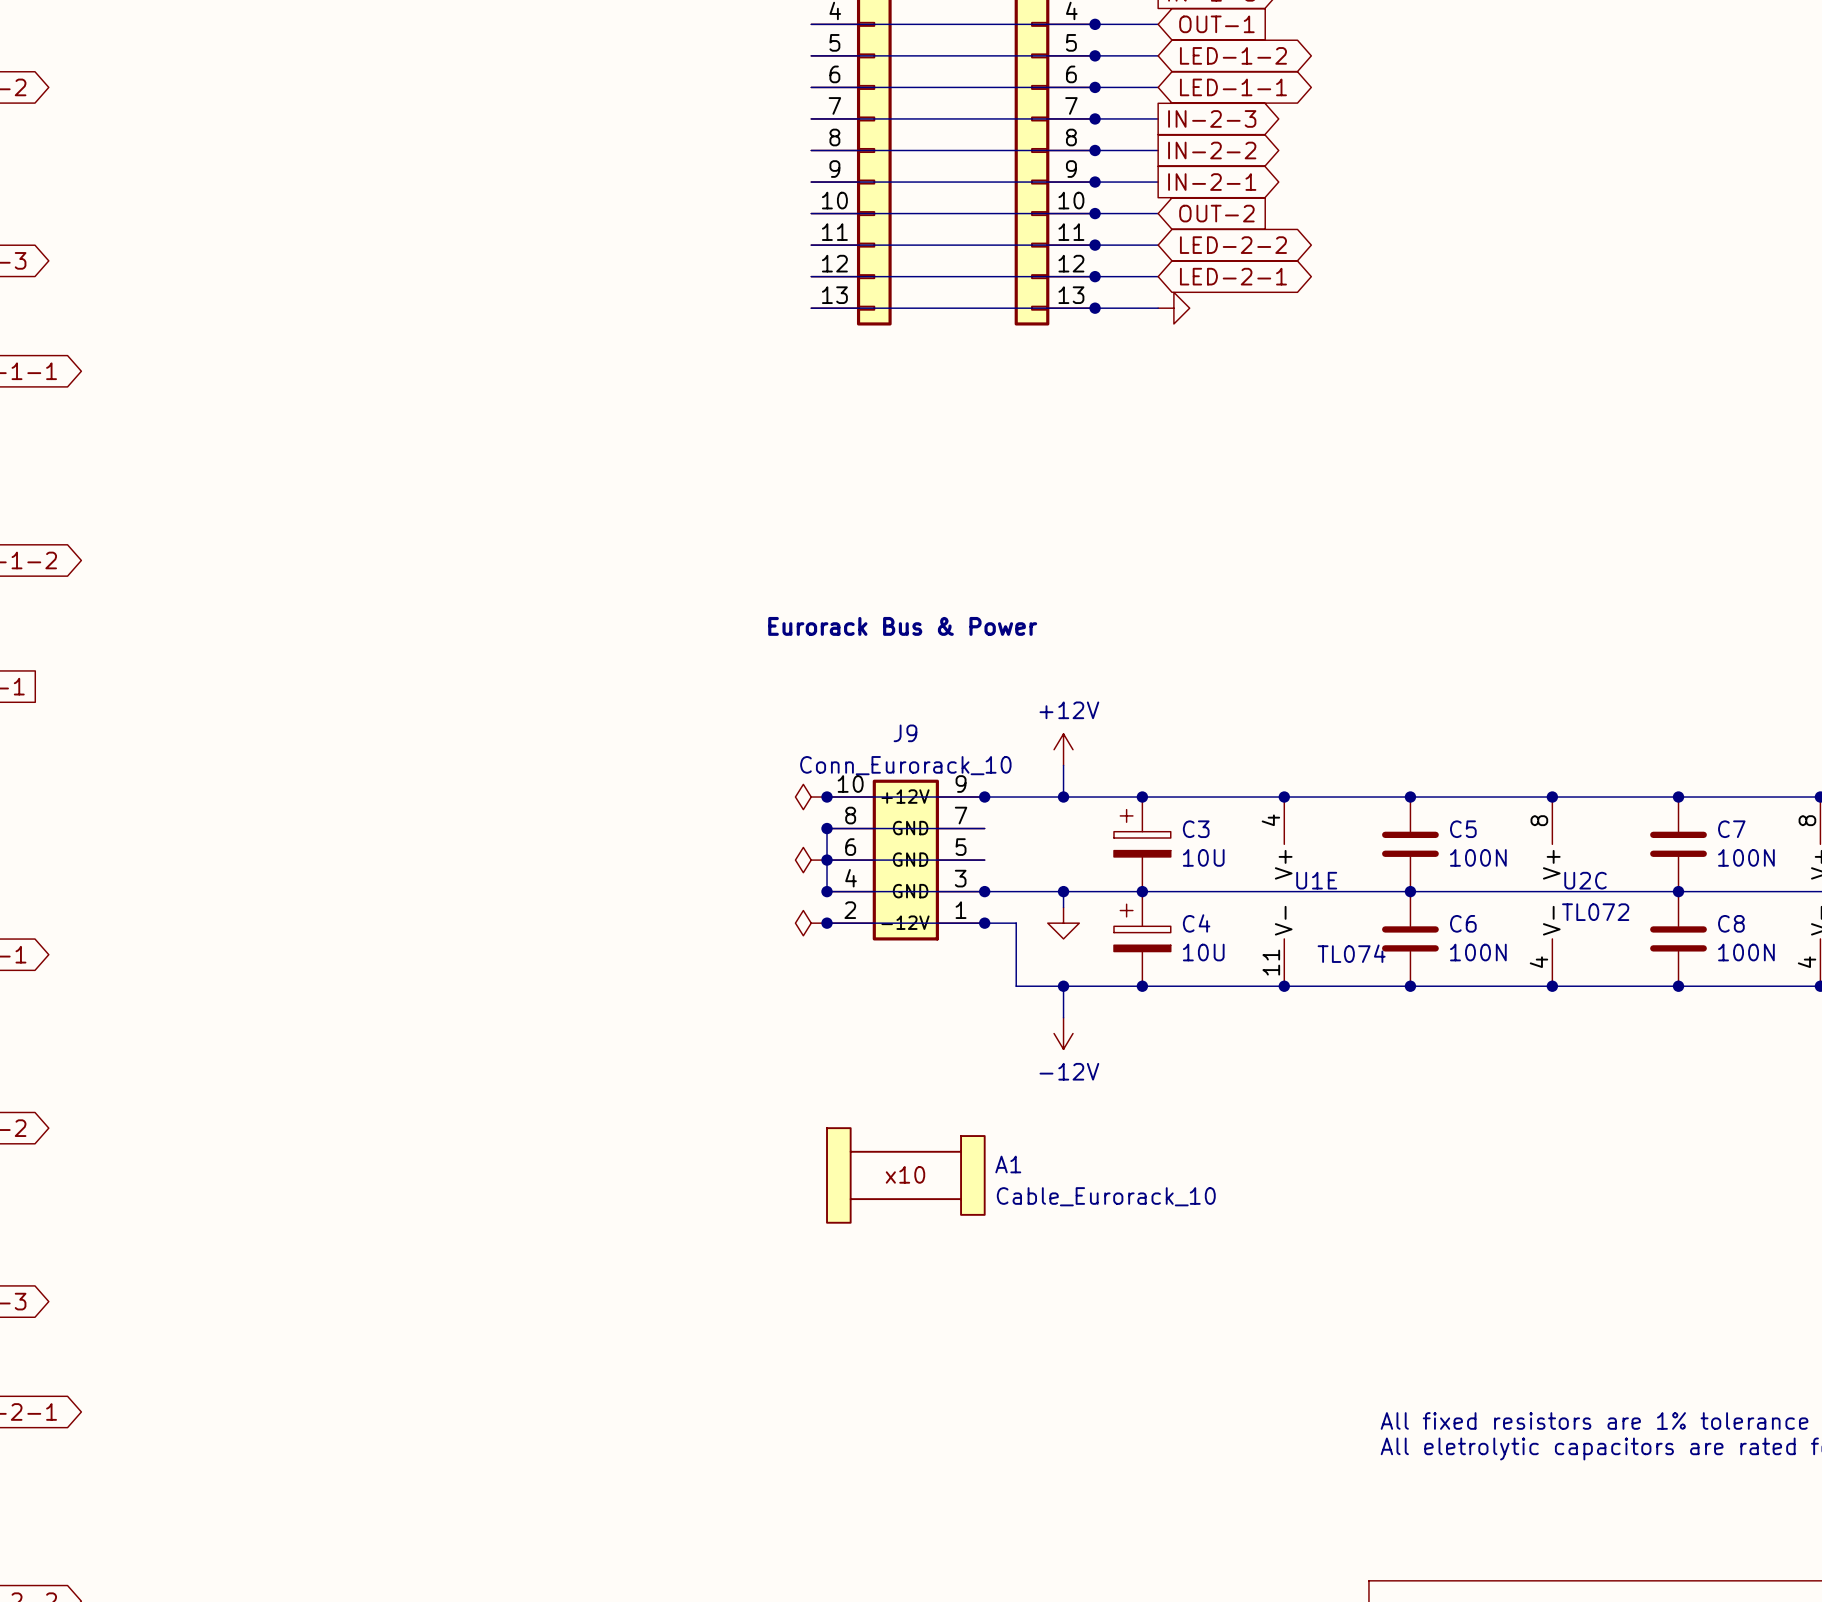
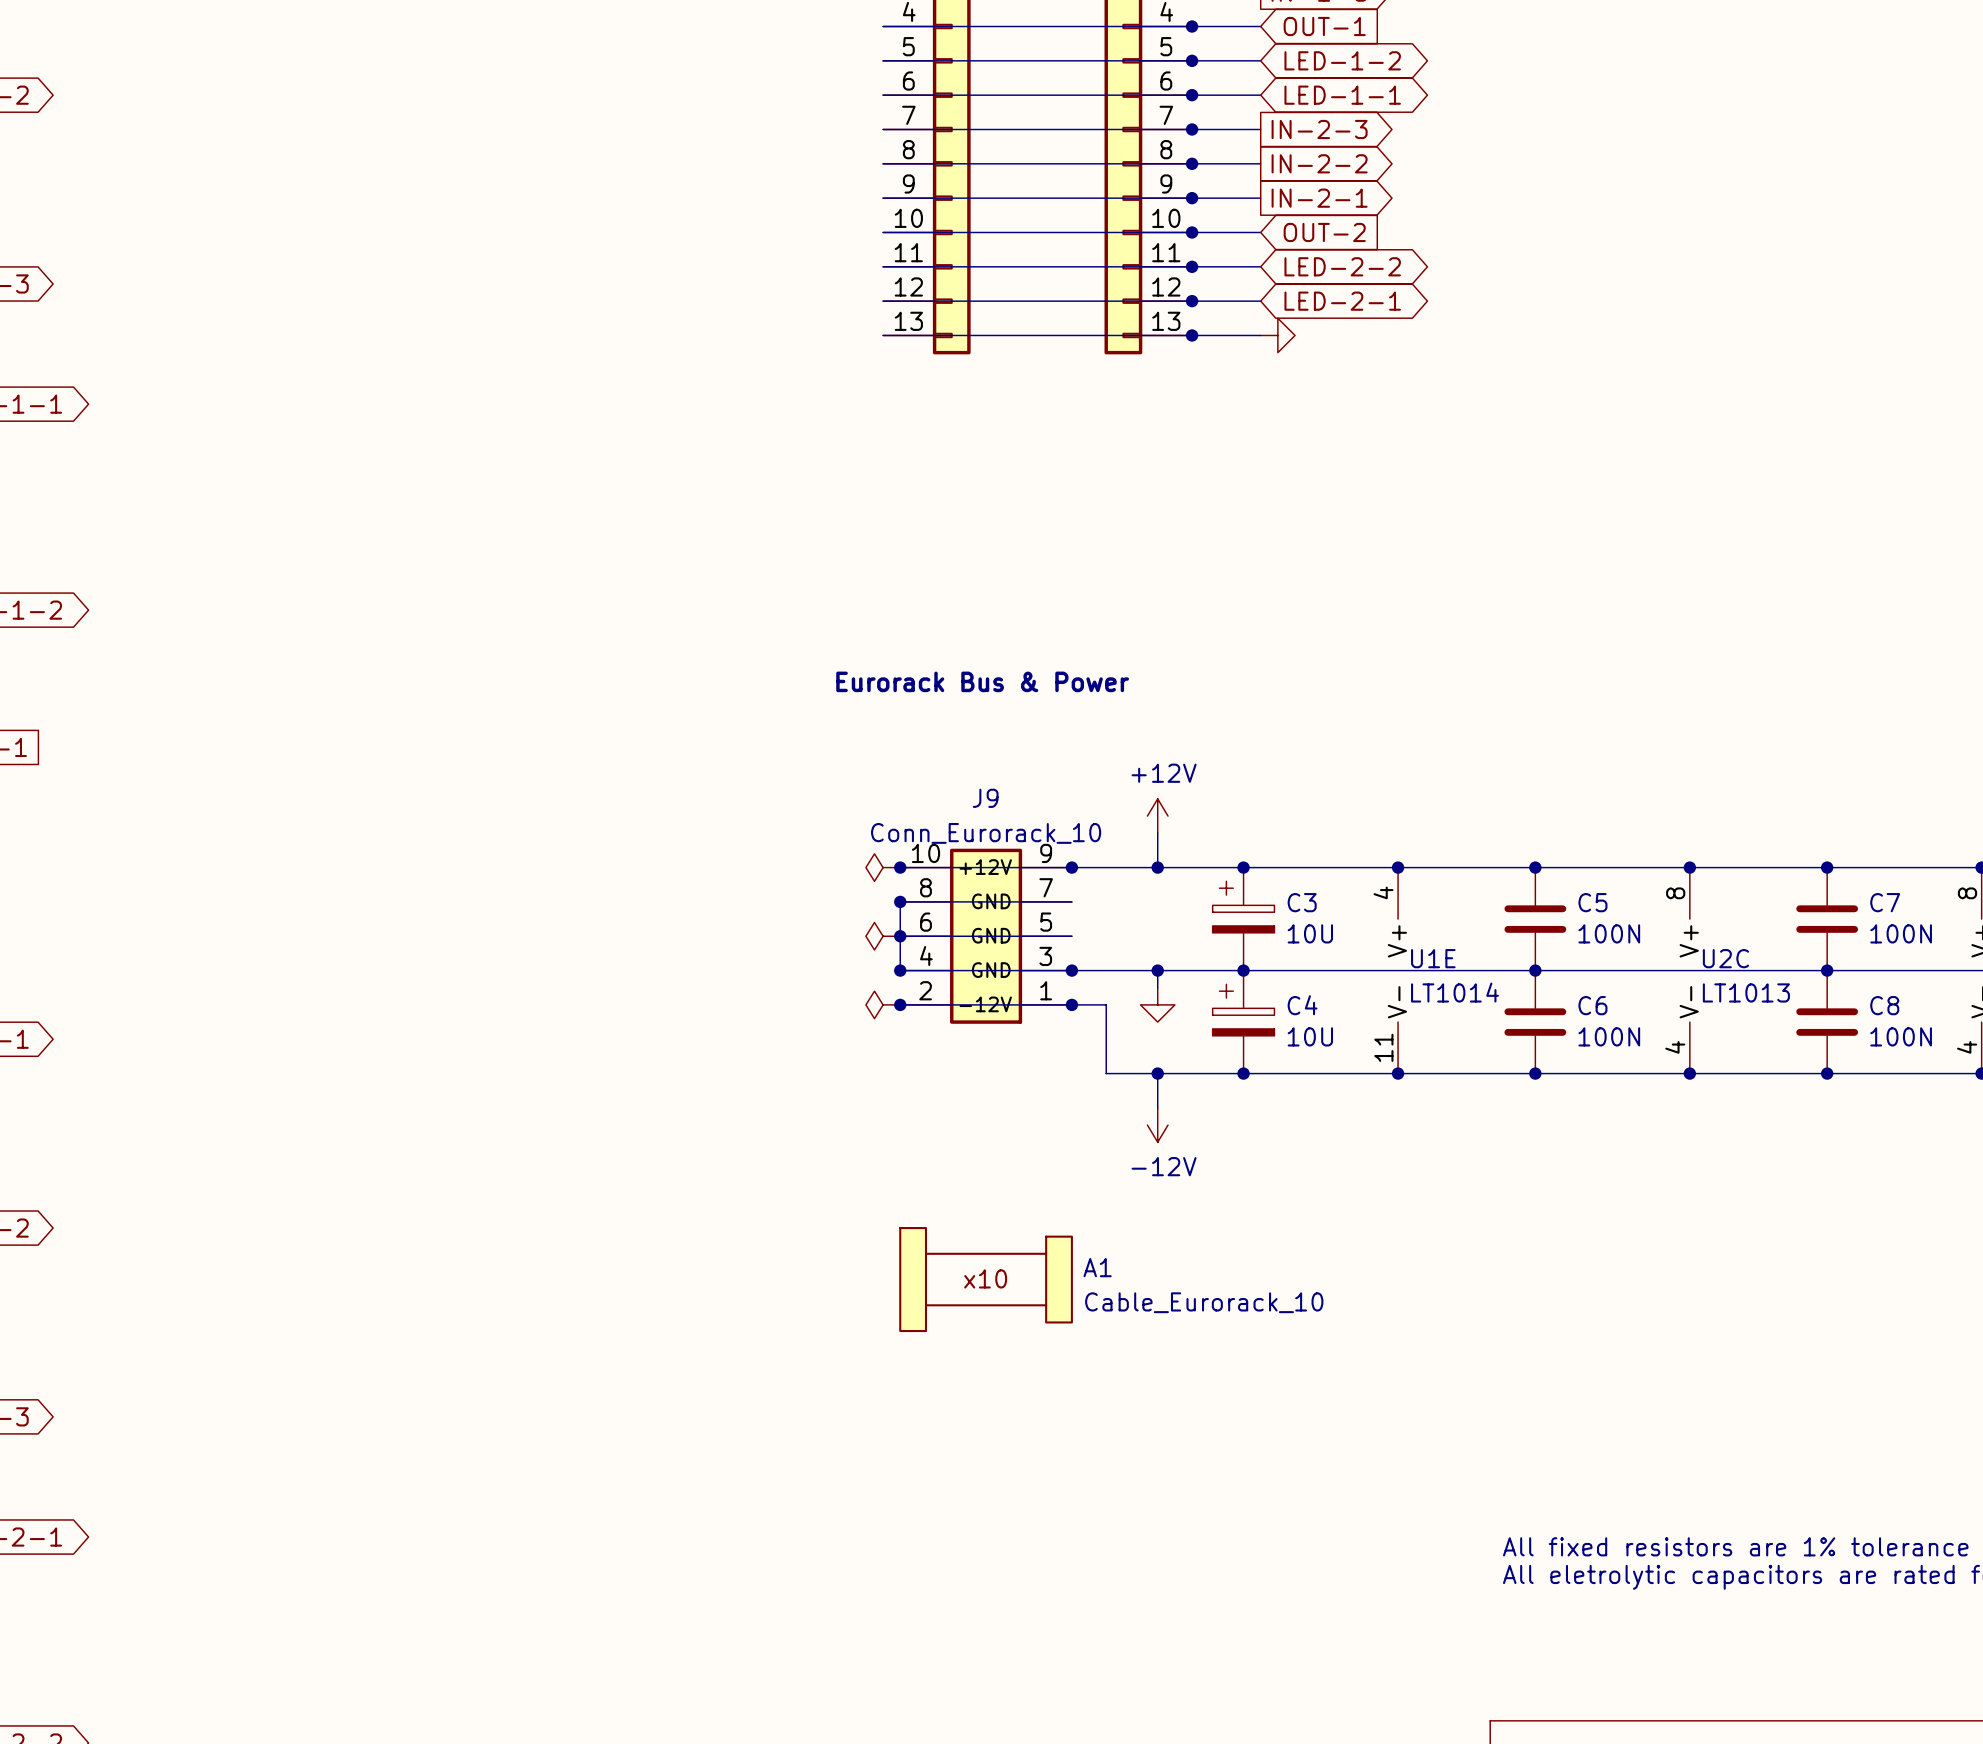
U2C value: TL072 (1595, 912) -> LT1013 (1746, 992)
U1E value: TL074 (1351, 953) -> LT1014 (1454, 992)

